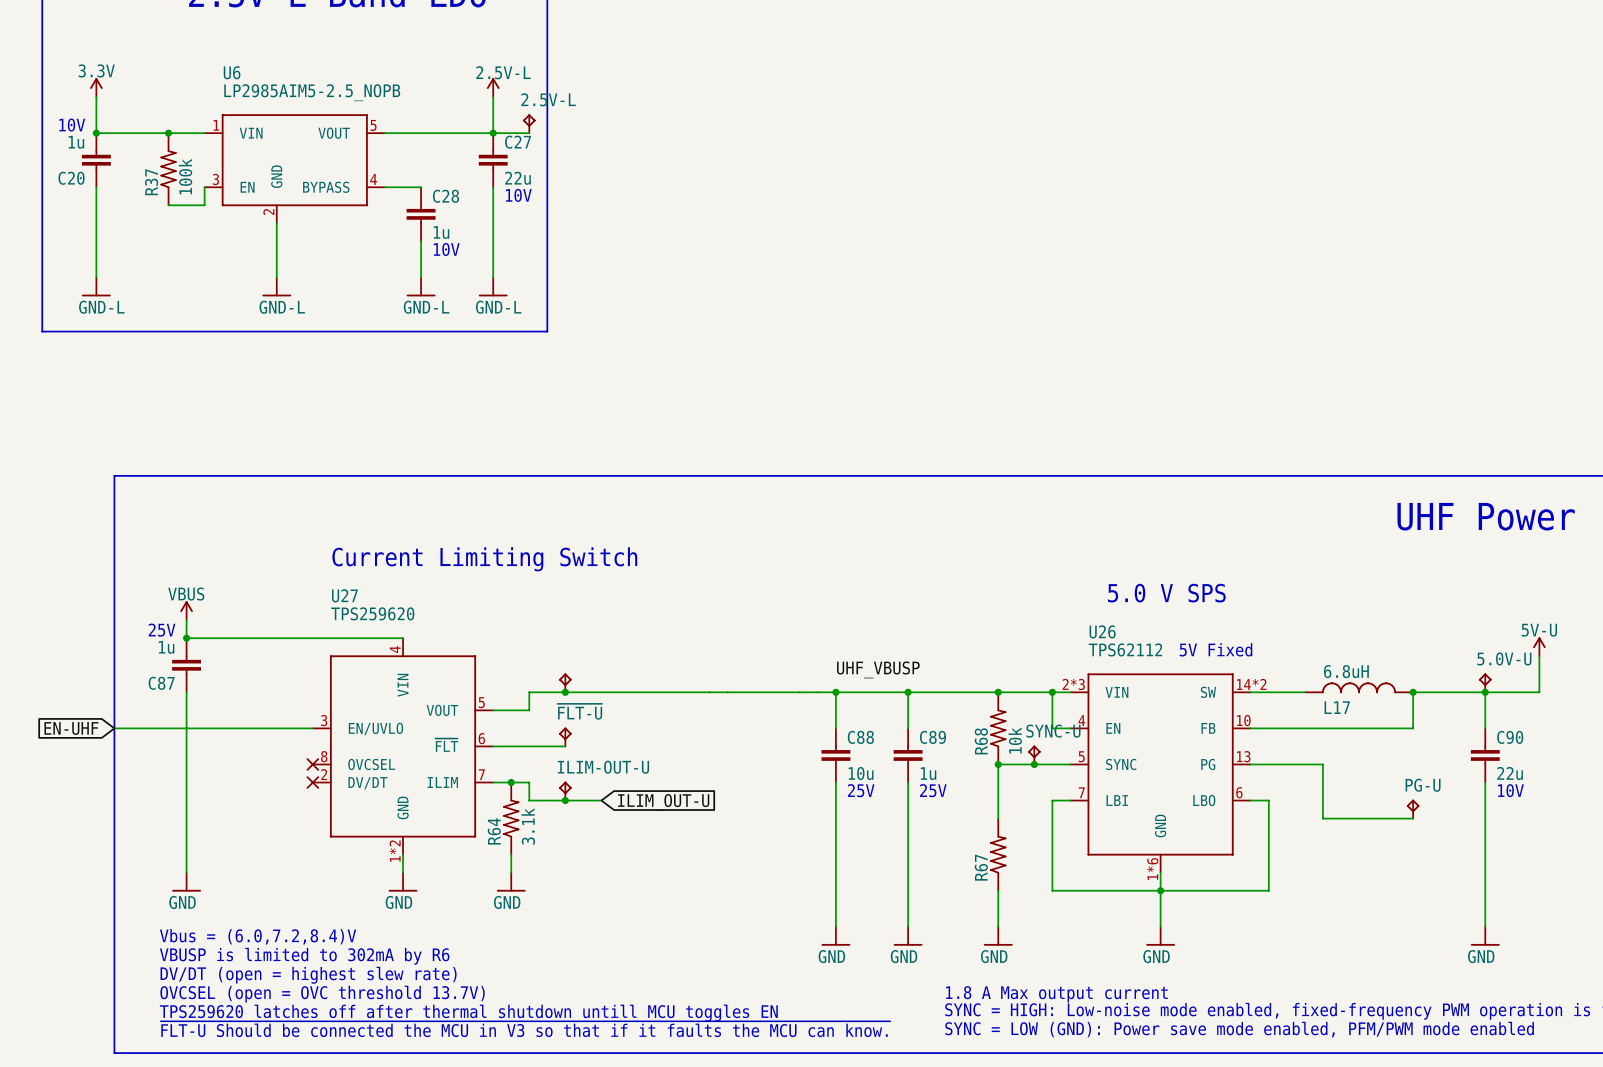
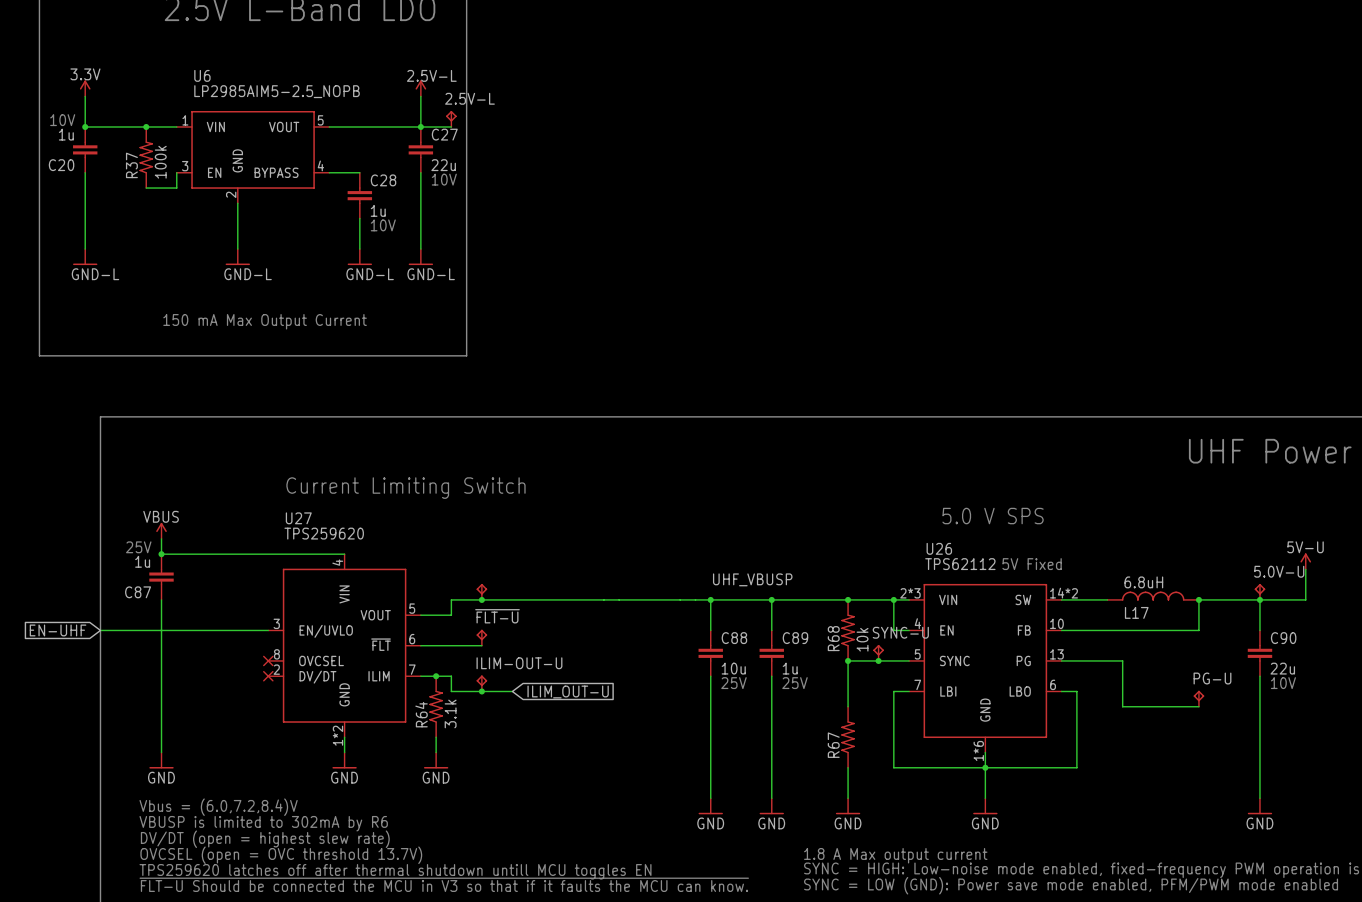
line: (42, 331) (547, 331) -> (39, 294) (39, 355) (466, 355) (466, 294)
text: none -> 150 mA Max Output Current (265, 321)

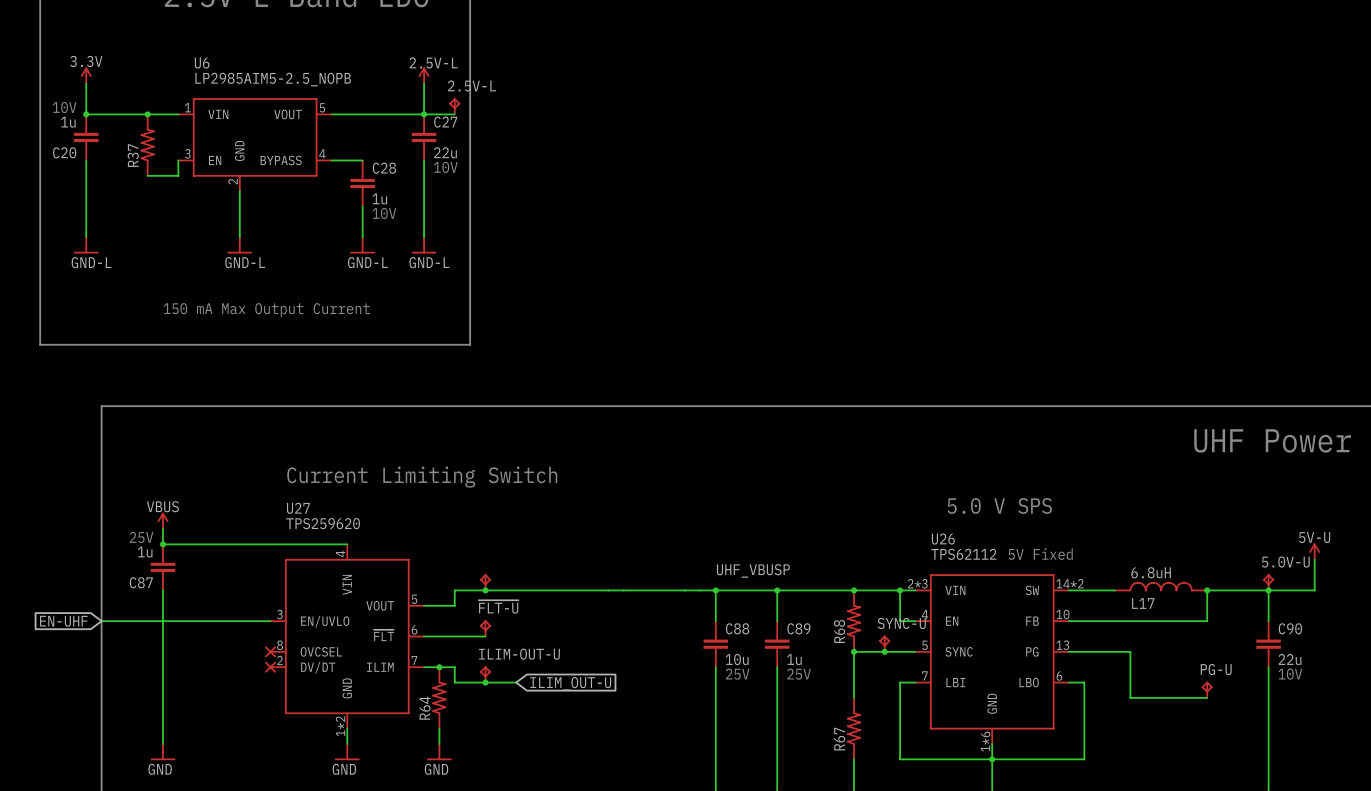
R37 value: 100k (160, 162) -> none
R68 value: 10k (862, 639) -> none
R64 value: 3.1k (450, 713) -> none

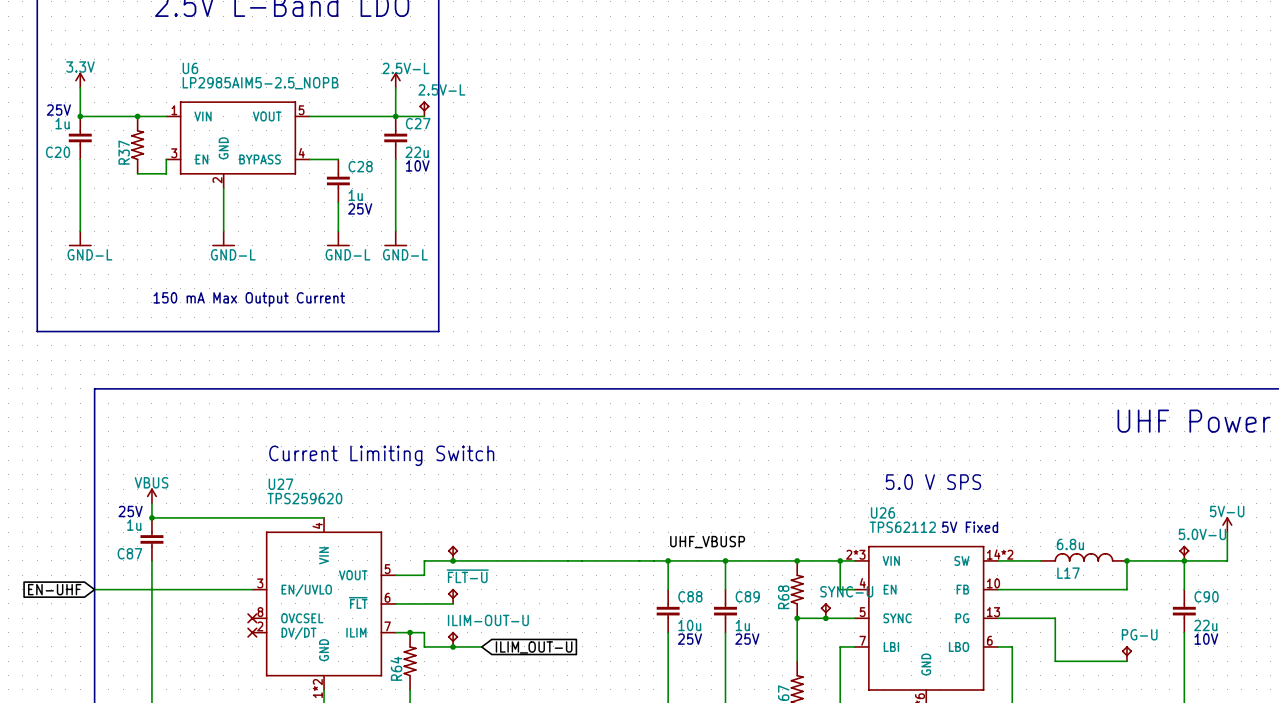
C20 text: 10V (64, 107) -> 25V (58, 110)
C28 text: 10V (384, 213) -> 25V (360, 208)
L17 value: 6.8uH (1151, 572) -> 6.8u (1070, 544)

